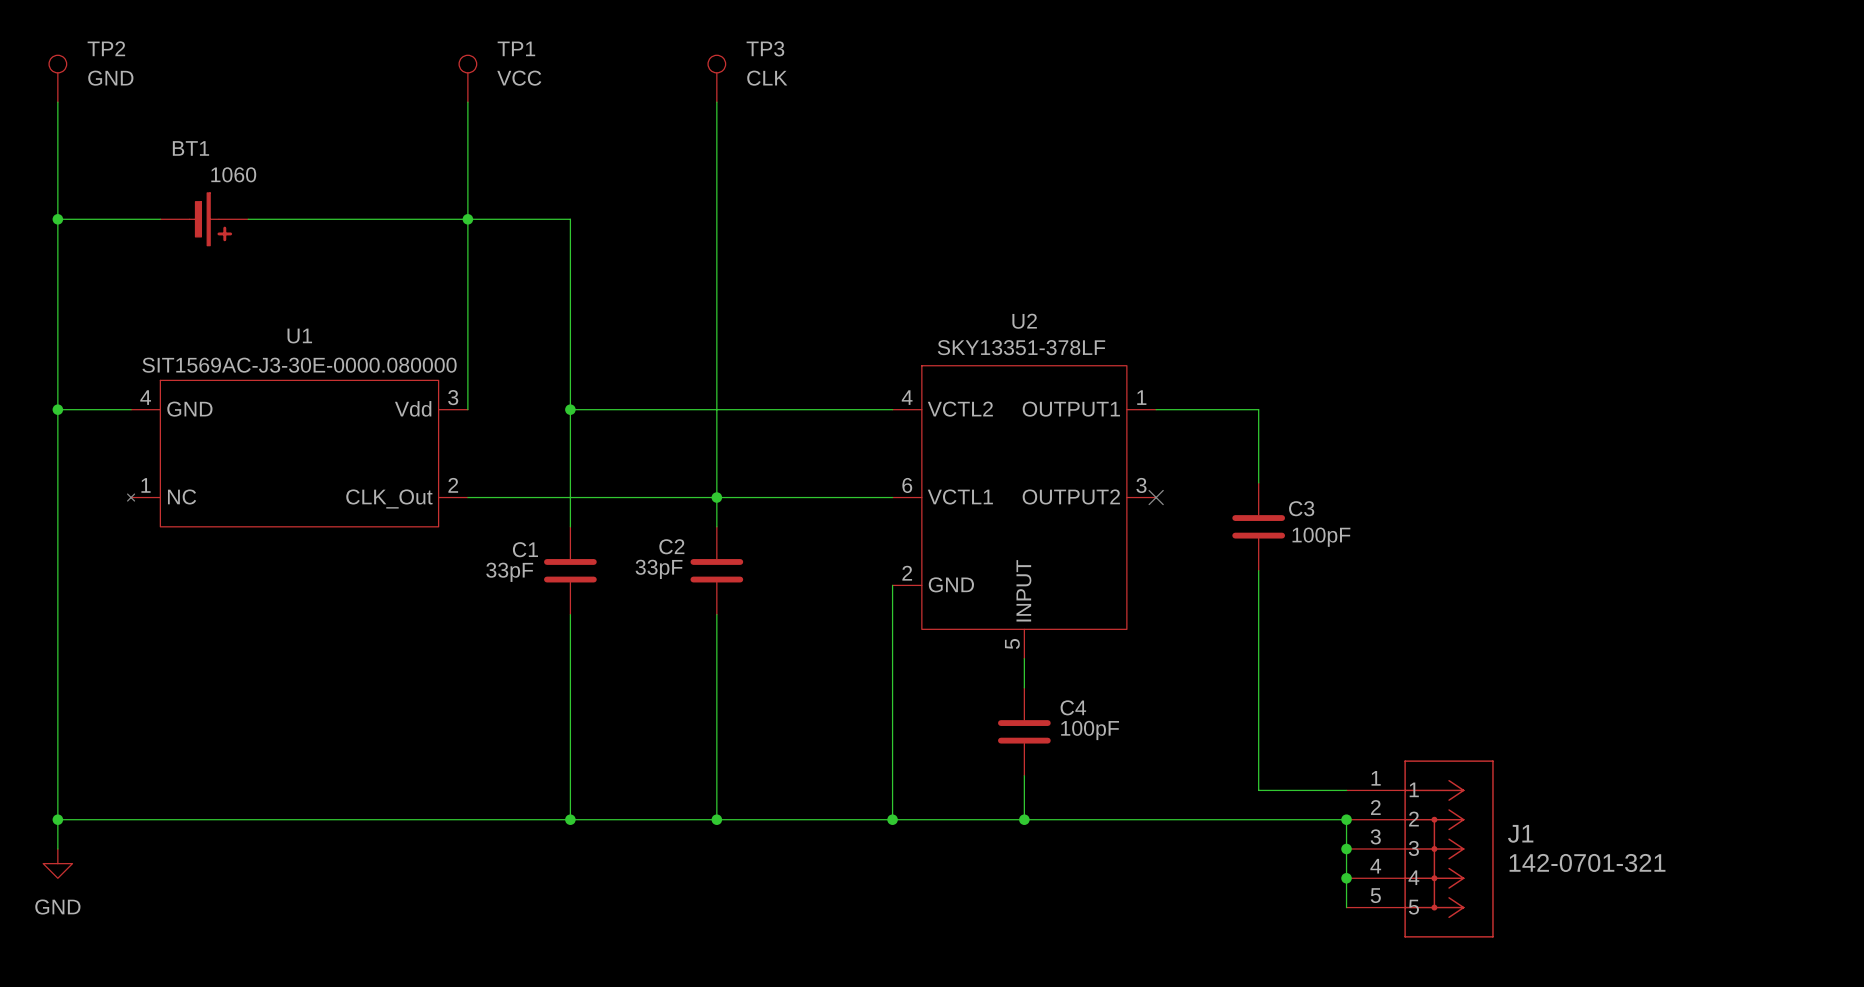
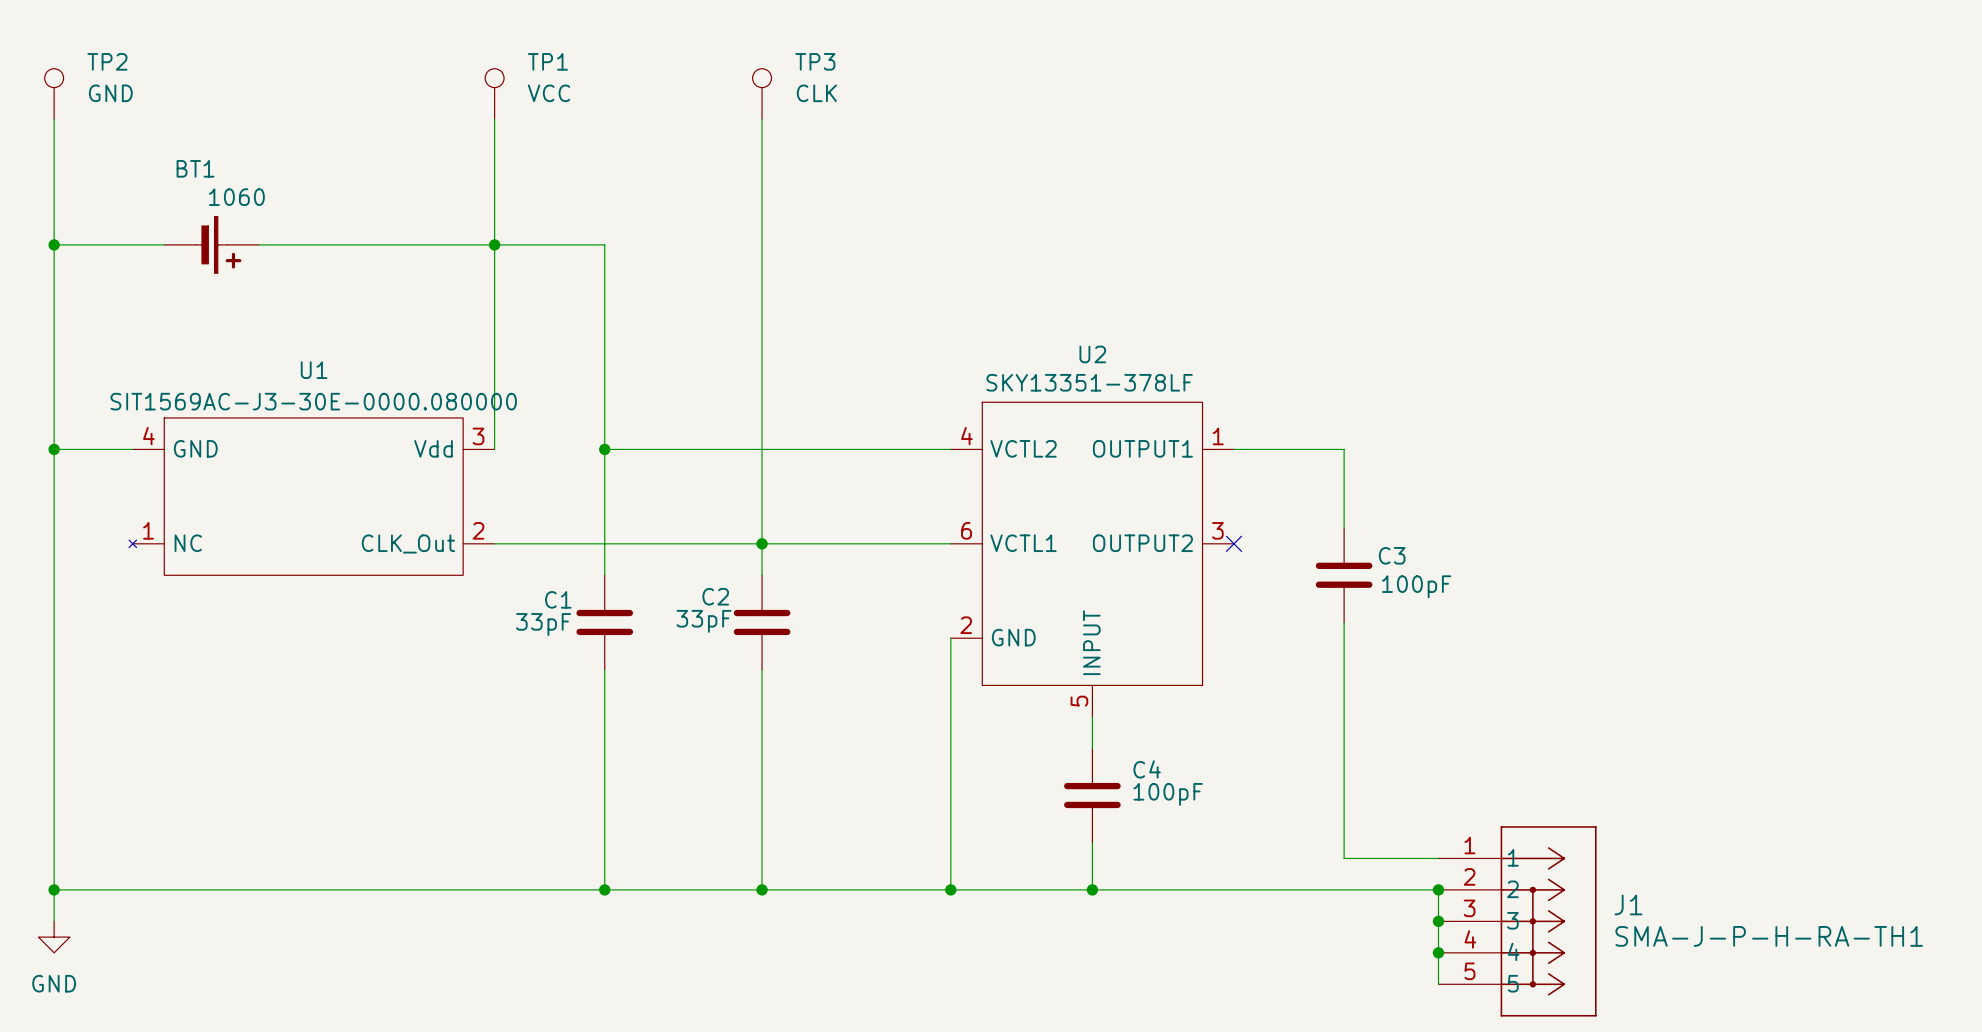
J1 value: 142-0701-321 (1587, 862) -> SMA-J-P-H-RA-TH1 (1769, 936)

